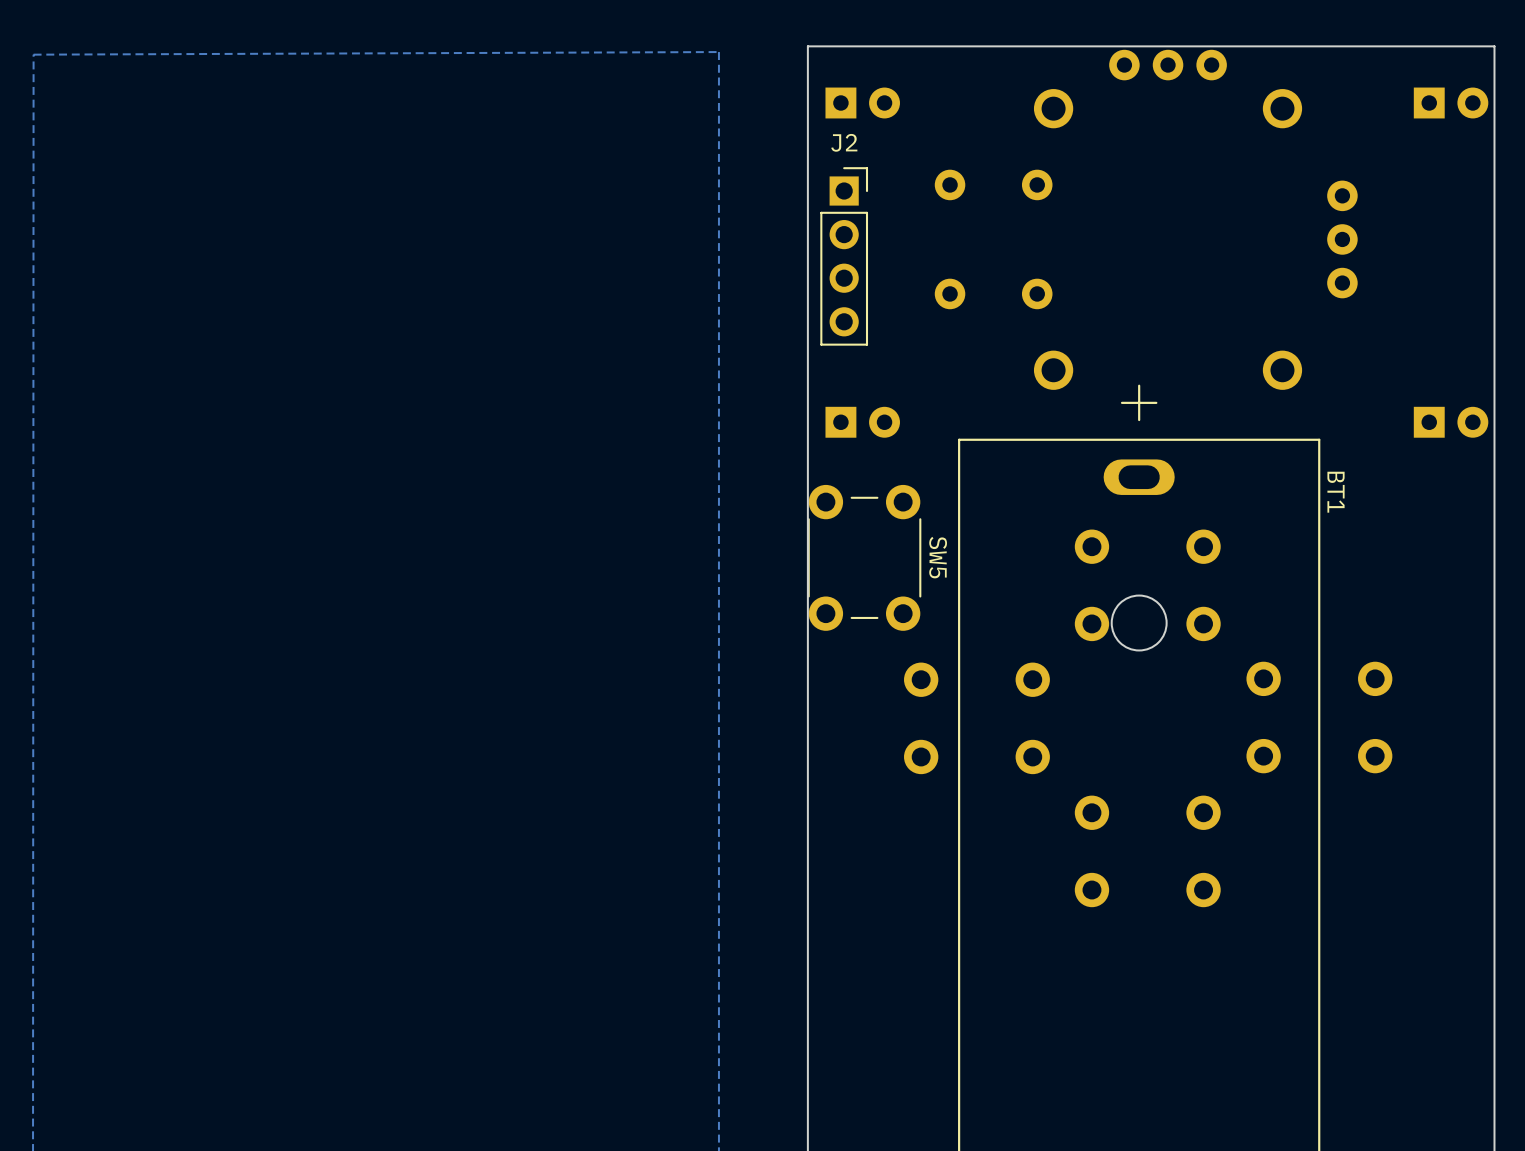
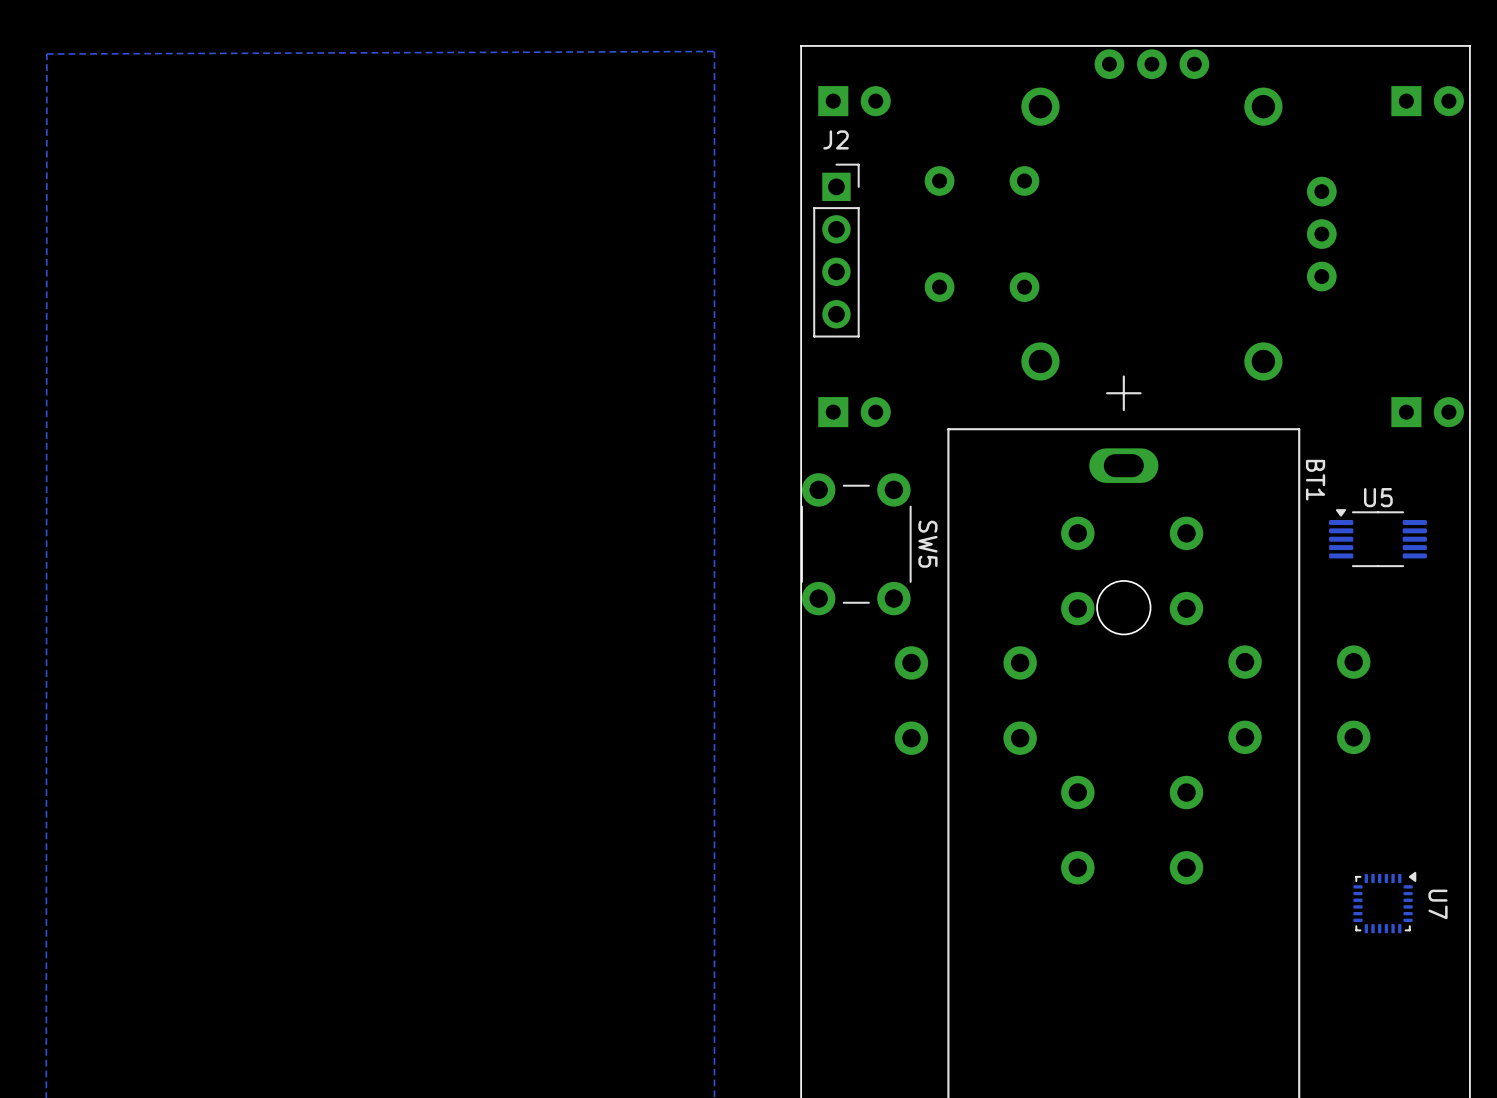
U5: none -> (1377, 538)
U7: none -> (1384, 902)

